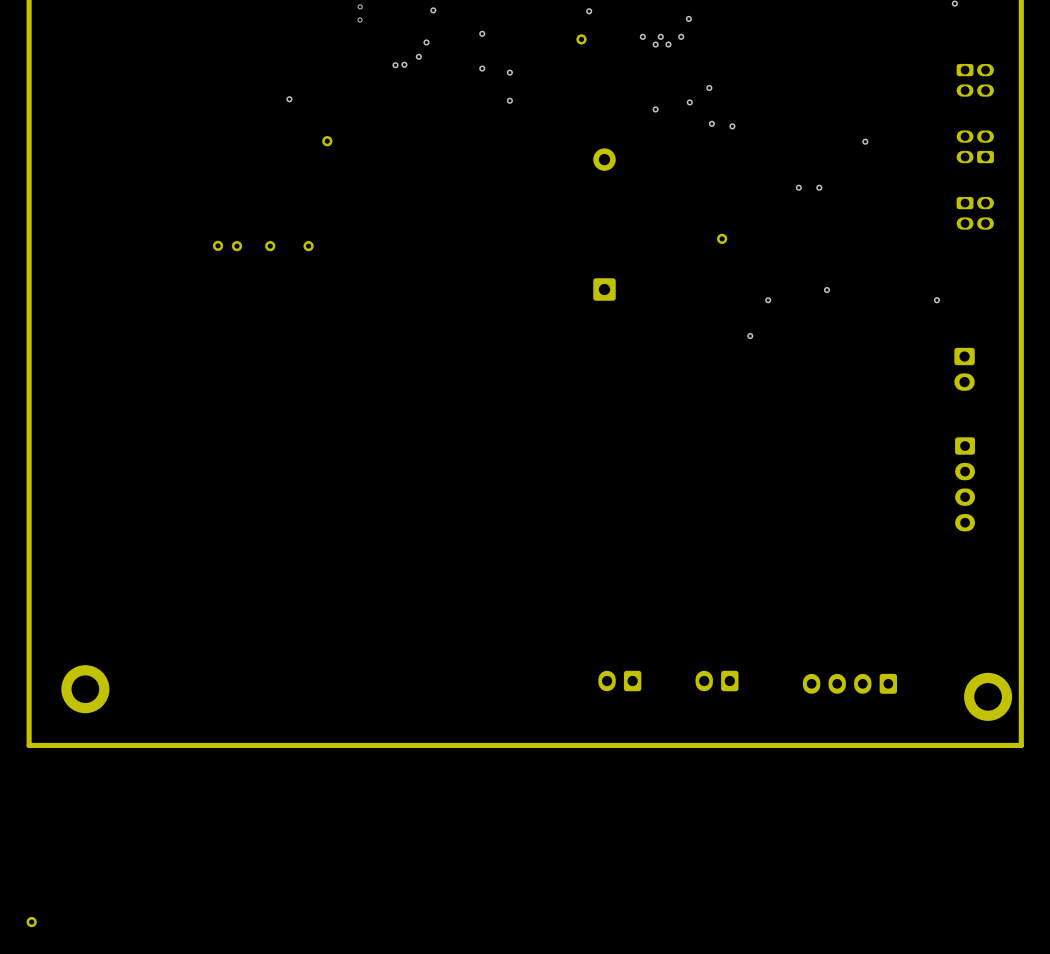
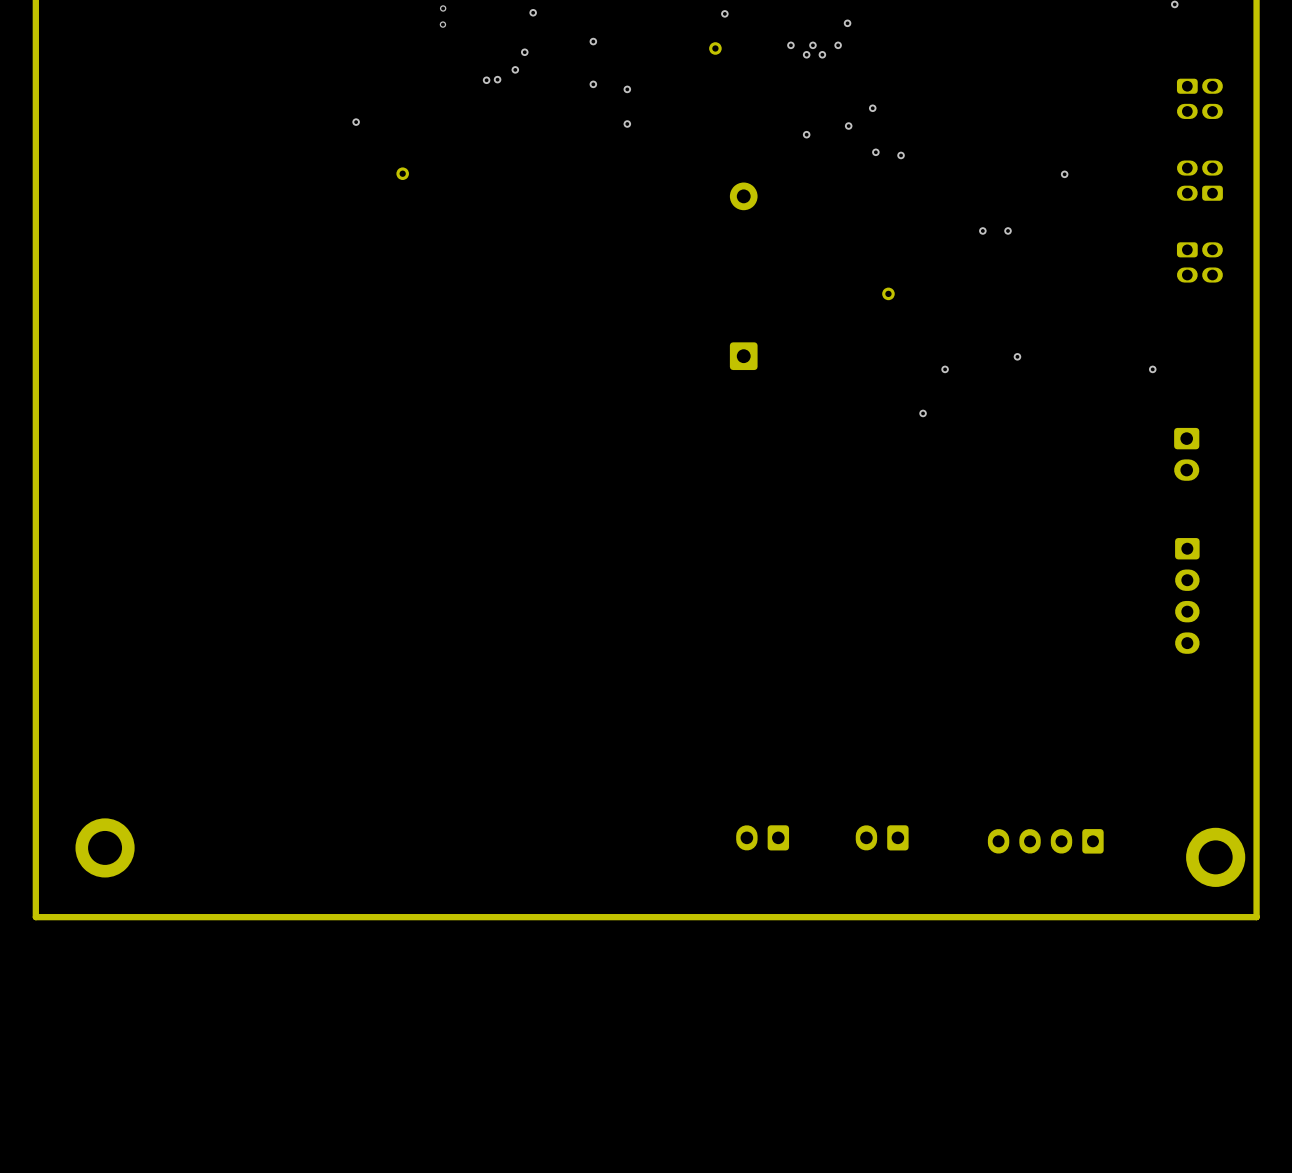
part: (218, 245) -> none
part: (237, 246) -> none
part: (270, 246) -> none
part: (308, 246) -> none
part: (31, 922) -> none

